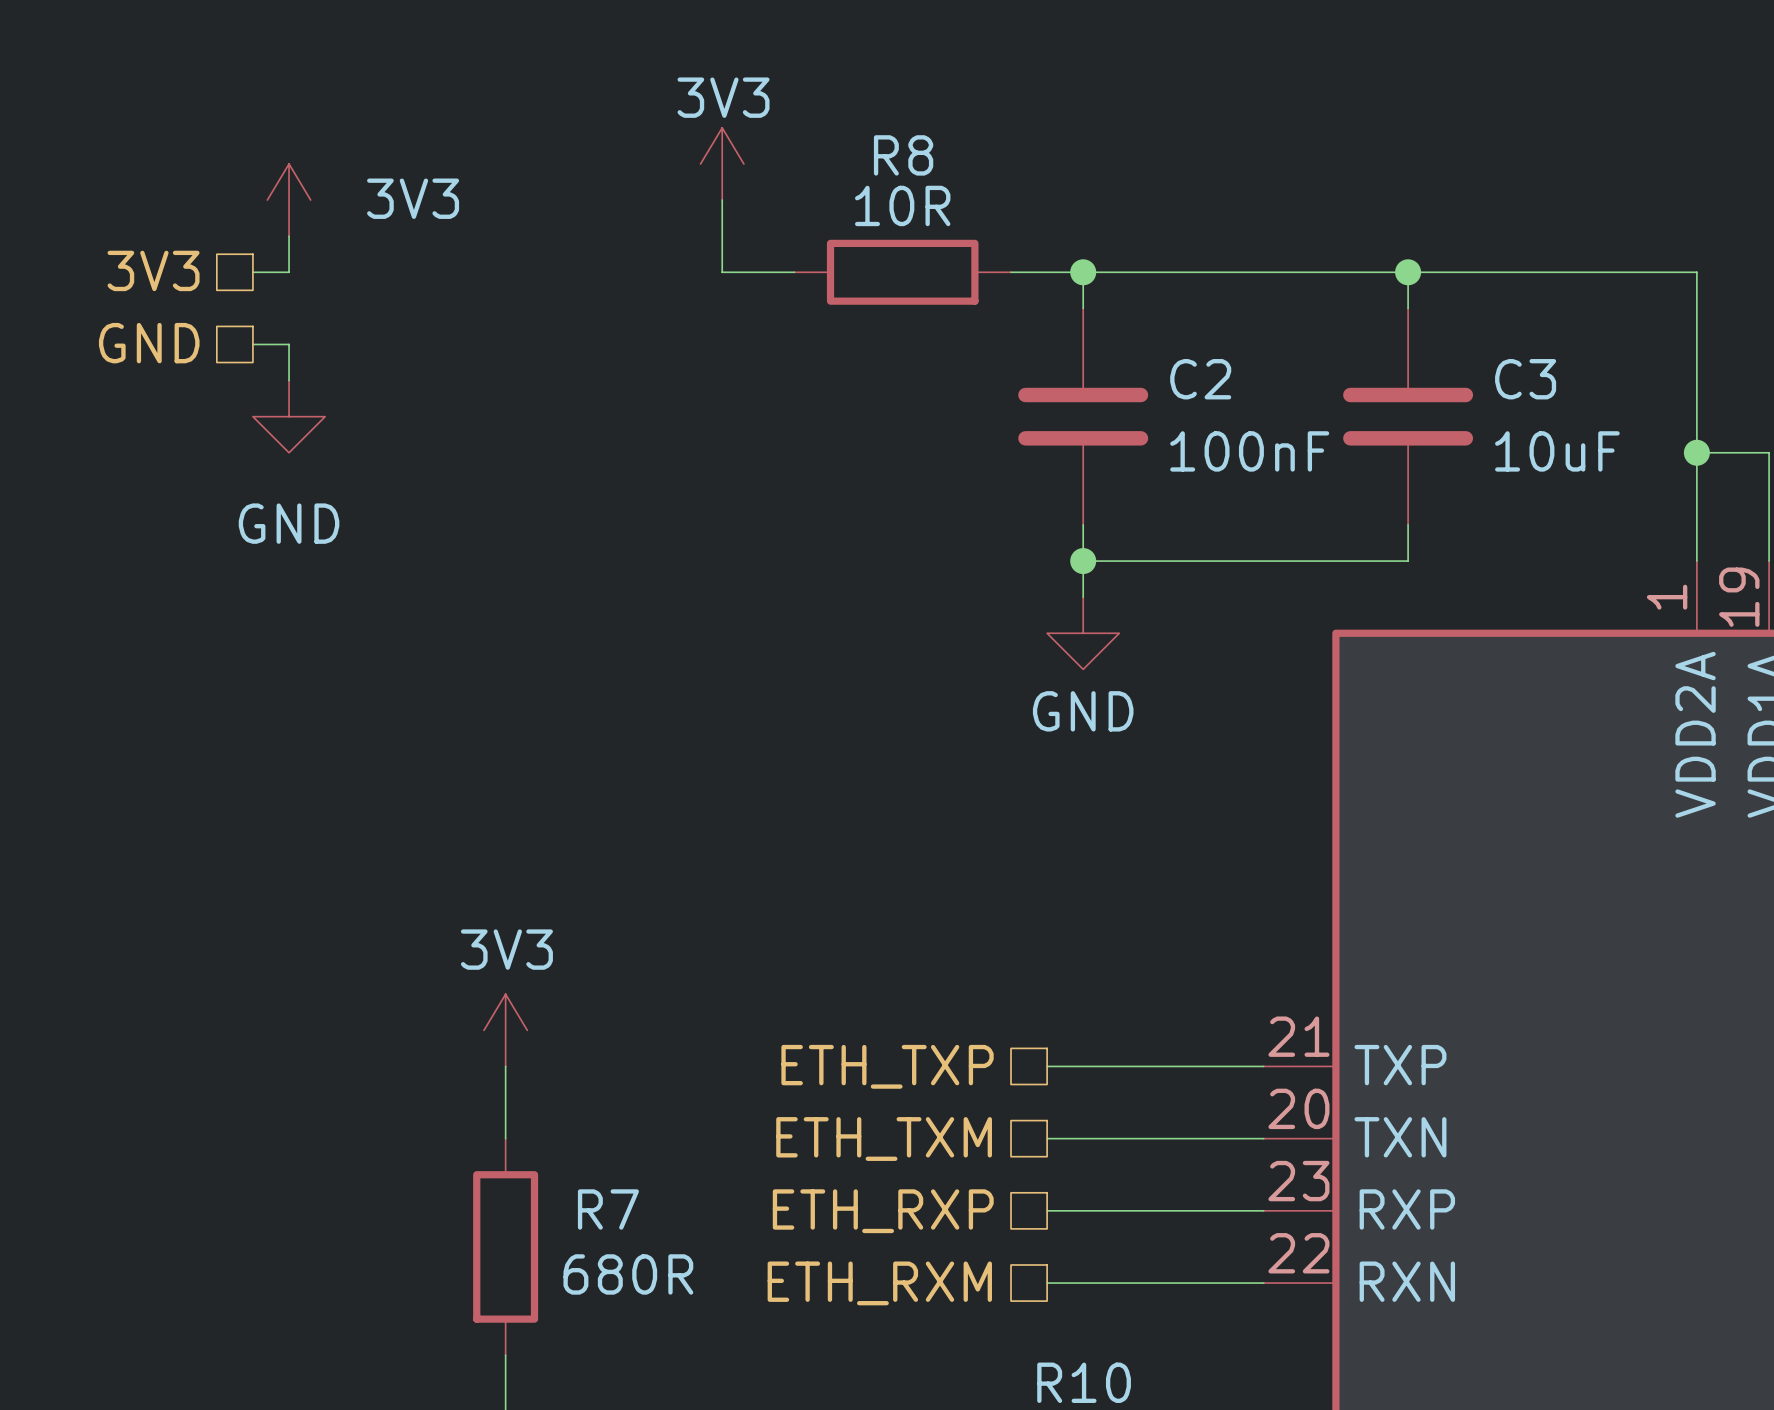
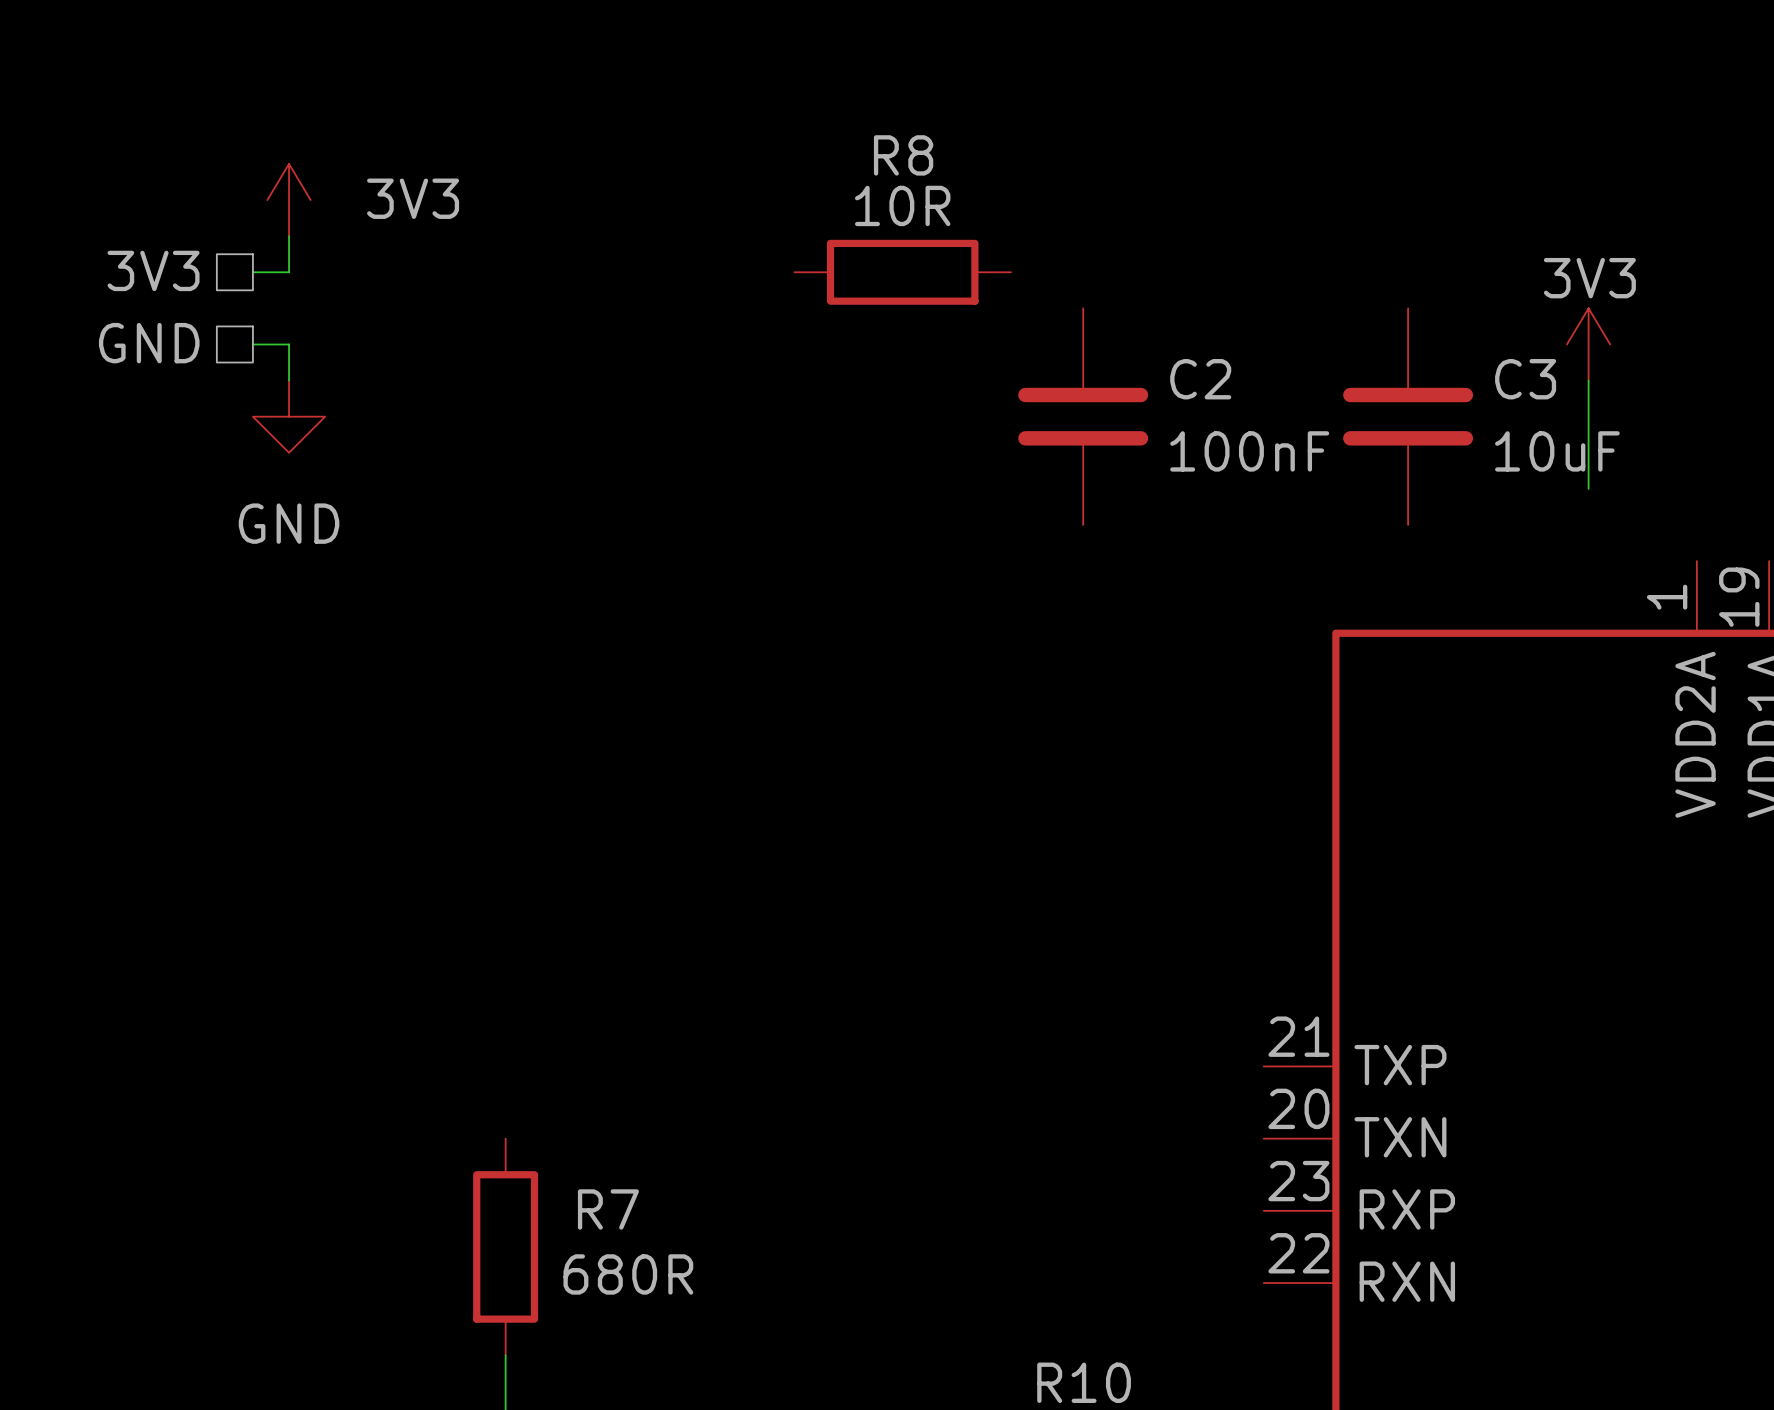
power symbol: 3V3 (722, 163) -> none
wire: (722, 200) (722, 272) (794, 272) -> none
wire: (1011, 272) (1696, 272) (1696, 561) -> none
wire: (1083, 272) (1083, 308) -> none
junction: (1083, 272) -> none
wire: (1408, 272) (1408, 308) -> none
junction: (1408, 272) -> none
power symbol: none -> 3V3 (1588, 344)
wire: none -> (1588, 380) (1588, 488)
wire: (1696, 452) (1769, 452) (1769, 561) -> none
junction: (1696, 452) -> none
wire: (1083, 524) (1083, 597) -> none
wire: (1408, 524) (1408, 561) (1083, 561) -> none
junction: (1083, 561) -> none
power symbol: GND (1083, 633) -> none
power symbol: 3V3 (505, 1030) -> none
wire: (505, 1066) (505, 1138) -> none
hierarchical label: ETH_TXP (887, 1066) -> none
wire: (1047, 1066) (1263, 1066) -> none
wire: (1047, 1138) (1263, 1138) -> none
hierarchical label: ETH_TXM (884, 1139) -> none
wire: (1047, 1210) (1263, 1210) -> none
hierarchical label: ETH_RXP (883, 1211) -> none
hierarchical label: ETH_RXM (879, 1283) -> none
wire: (1047, 1283) (1263, 1283) -> none

